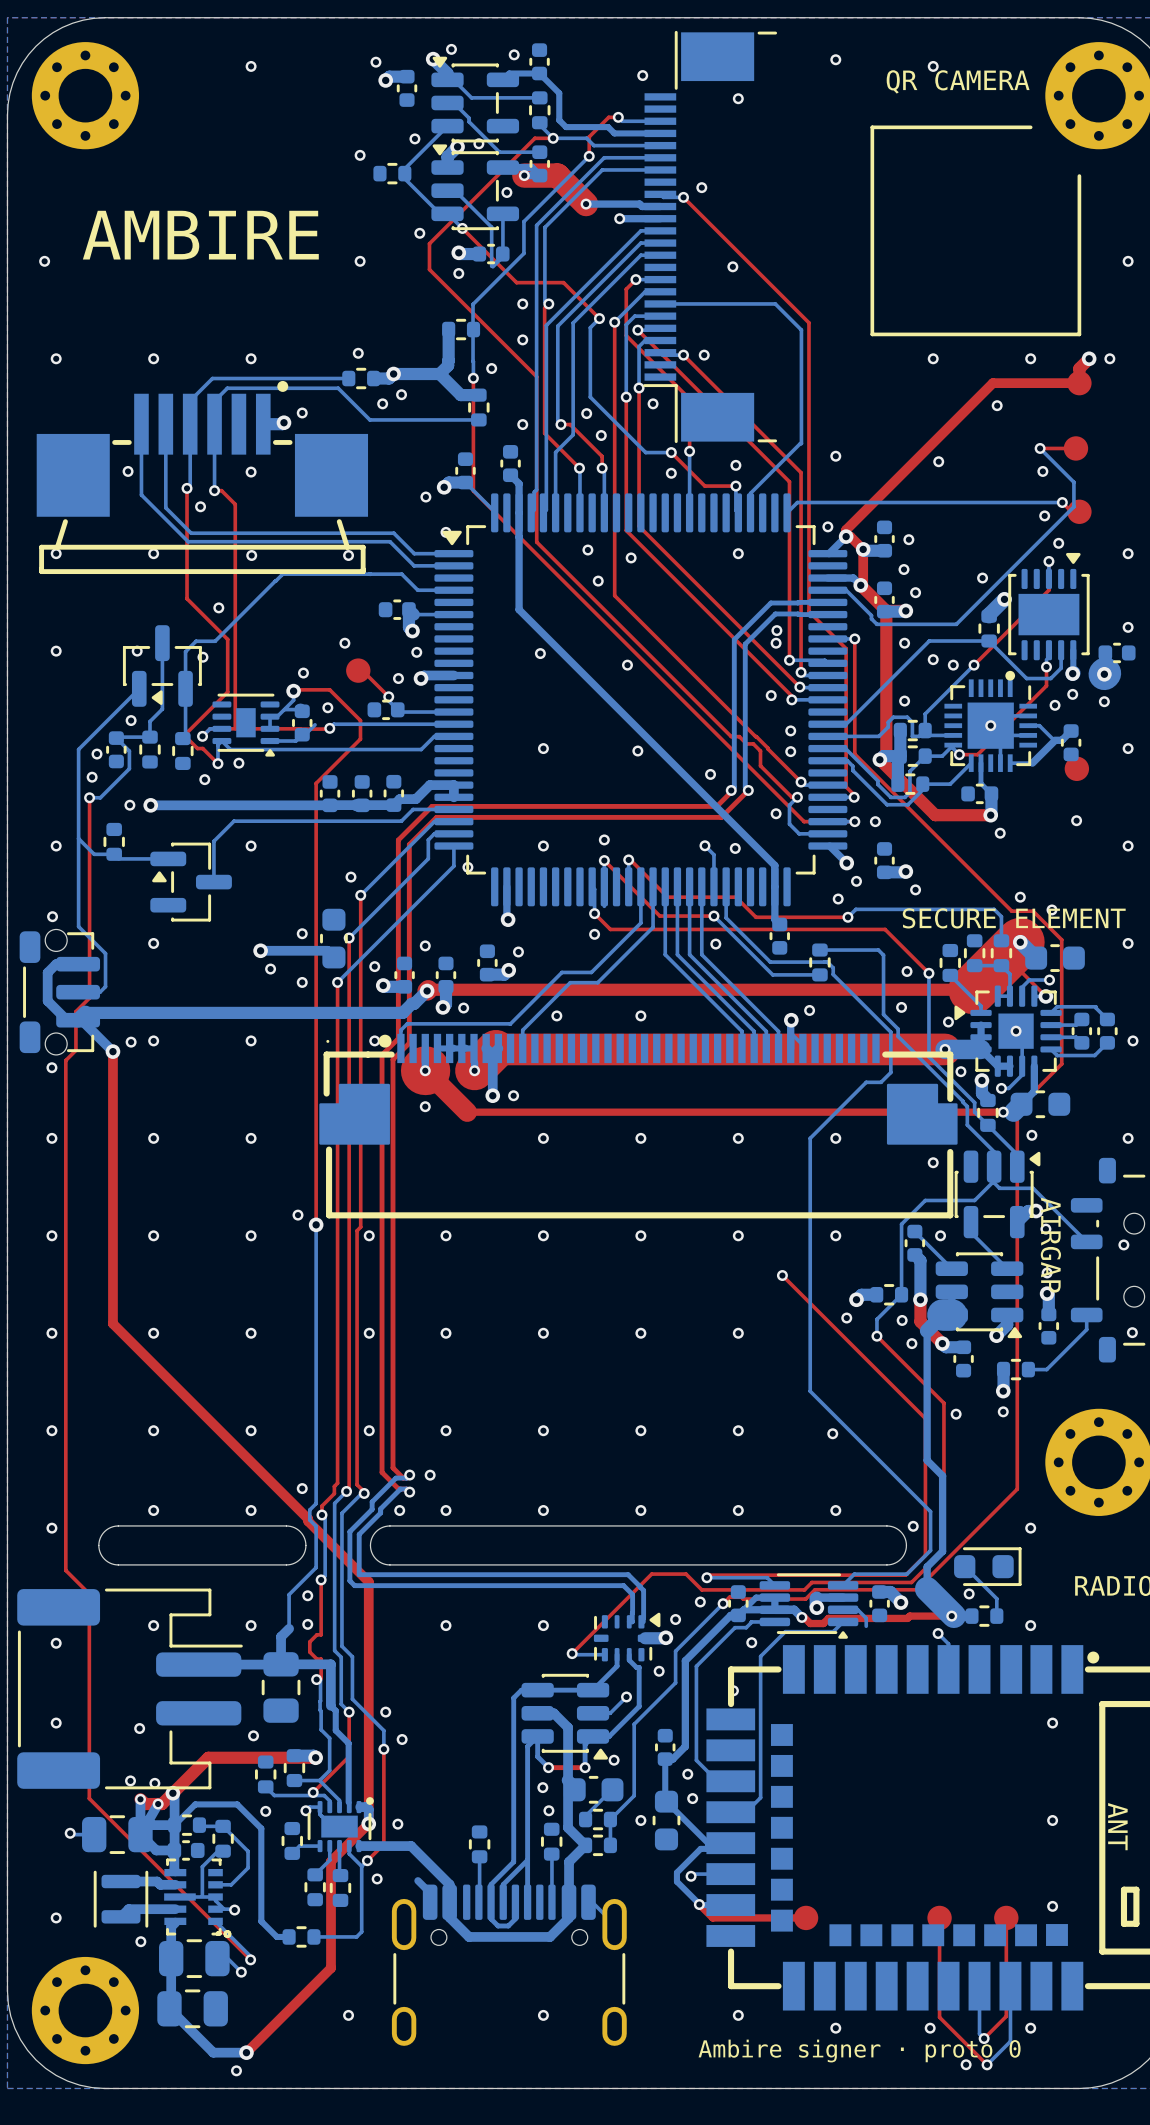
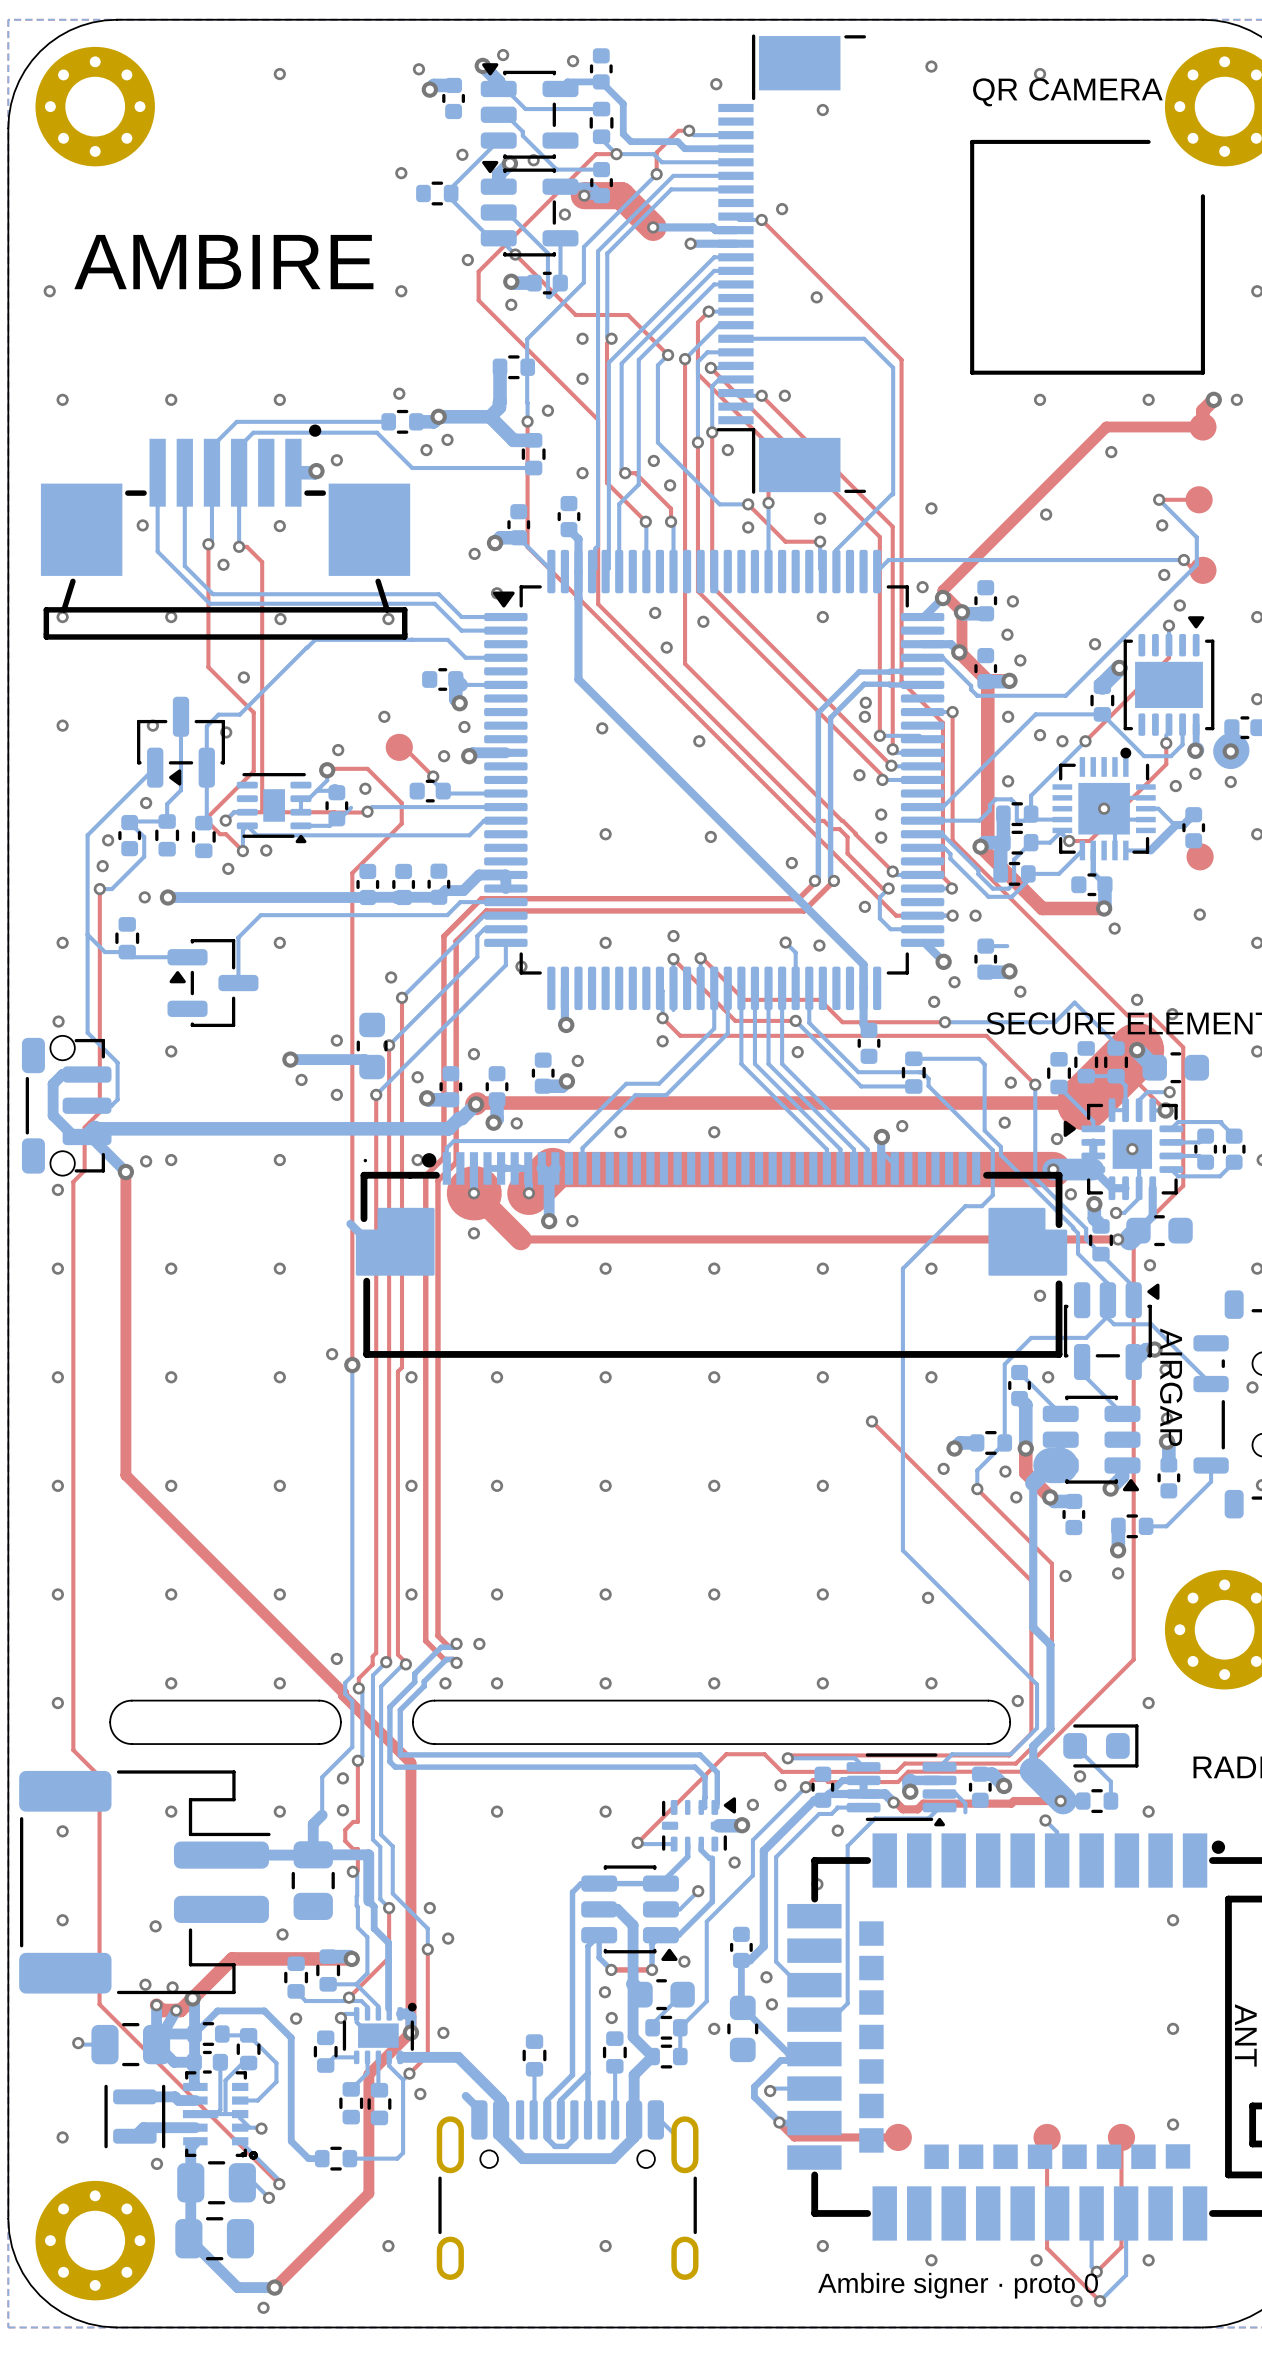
bottom track: none -> (1007, 946) (985, 946)
bottom track: (847, 917) (855, 909) (994, 909) (1001, 916) (1001, 936) -> (945, 1022) (1054, 1022) (1074, 1002) (1116, 1043)
bottom track: none -> (350, 1223) (368, 1241)
bottom track: none -> (220, 2062) (220, 2110) (218, 2111)

